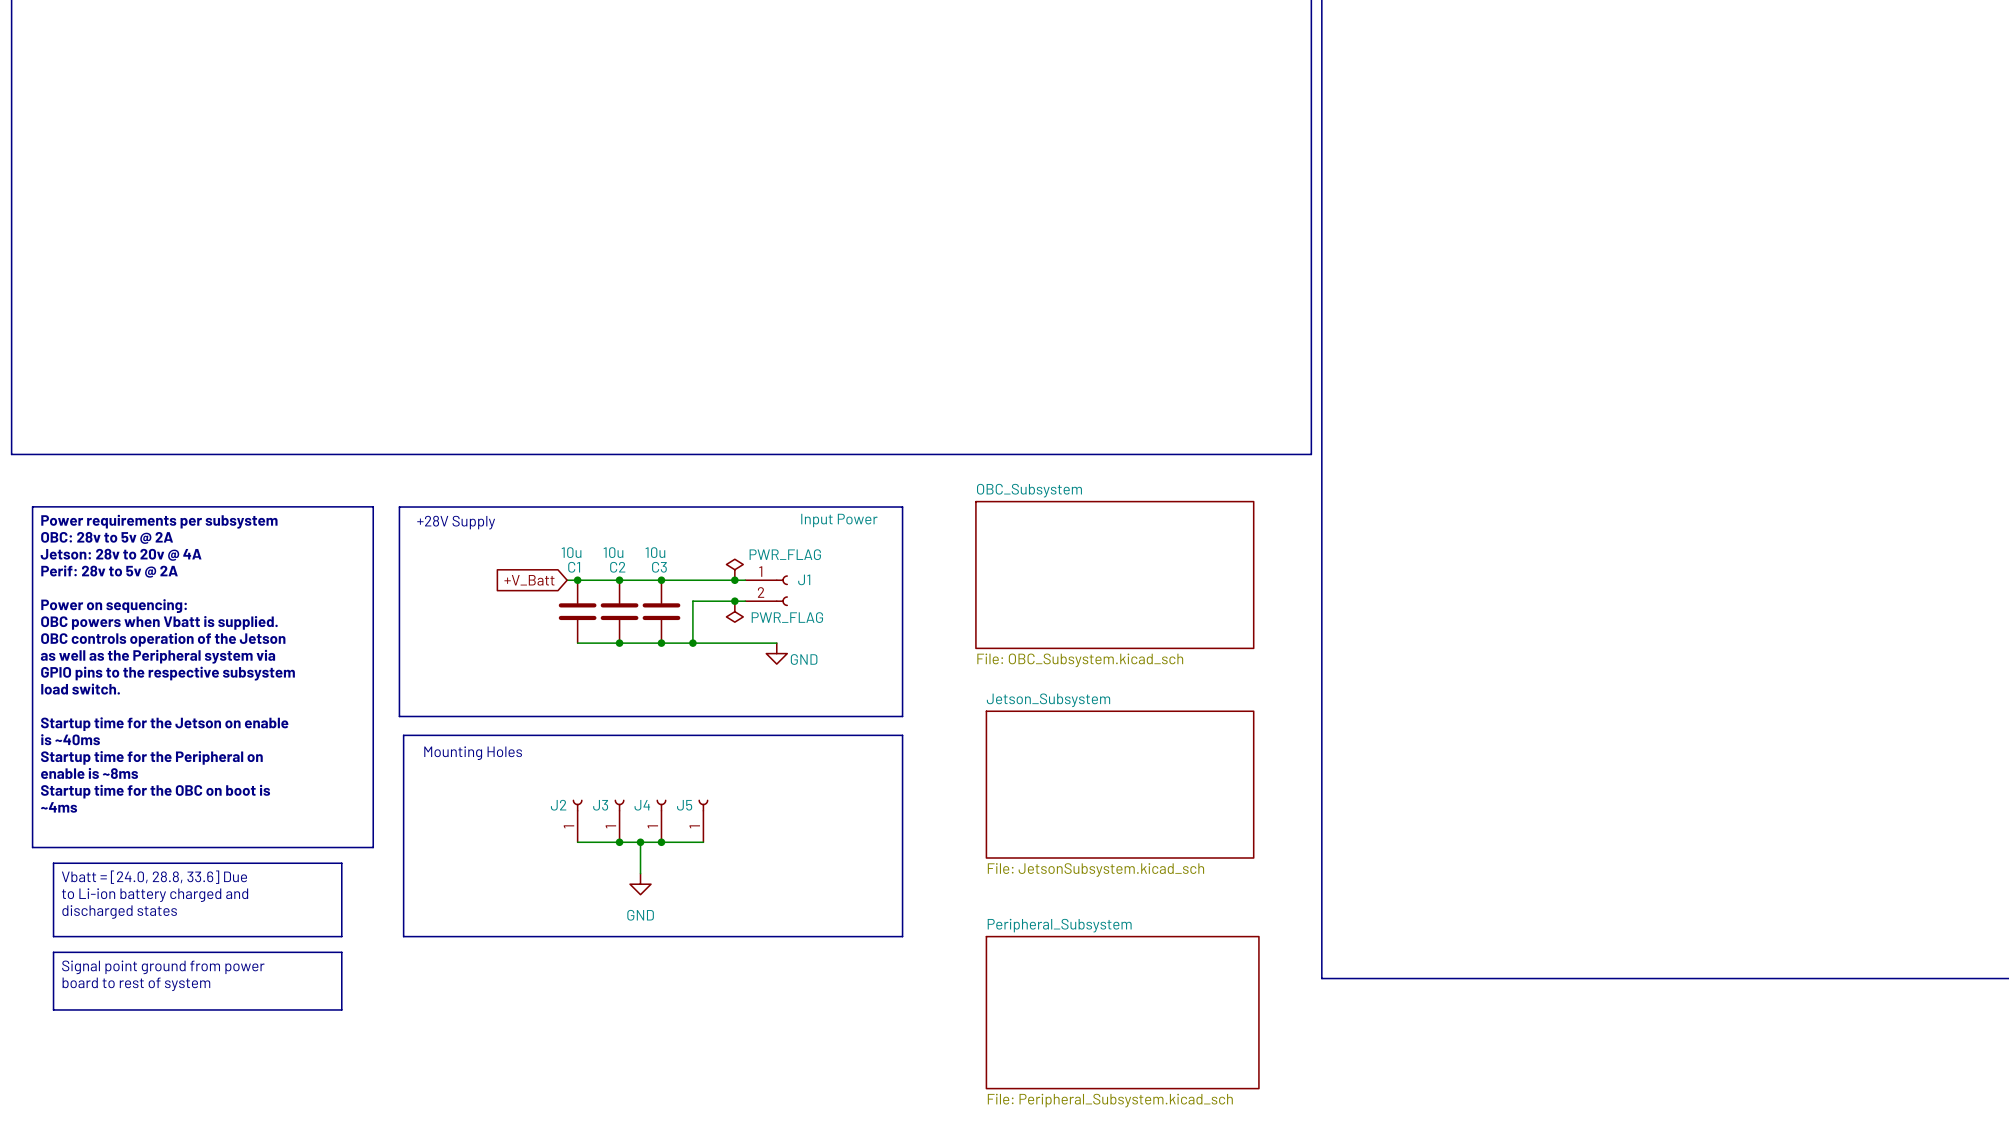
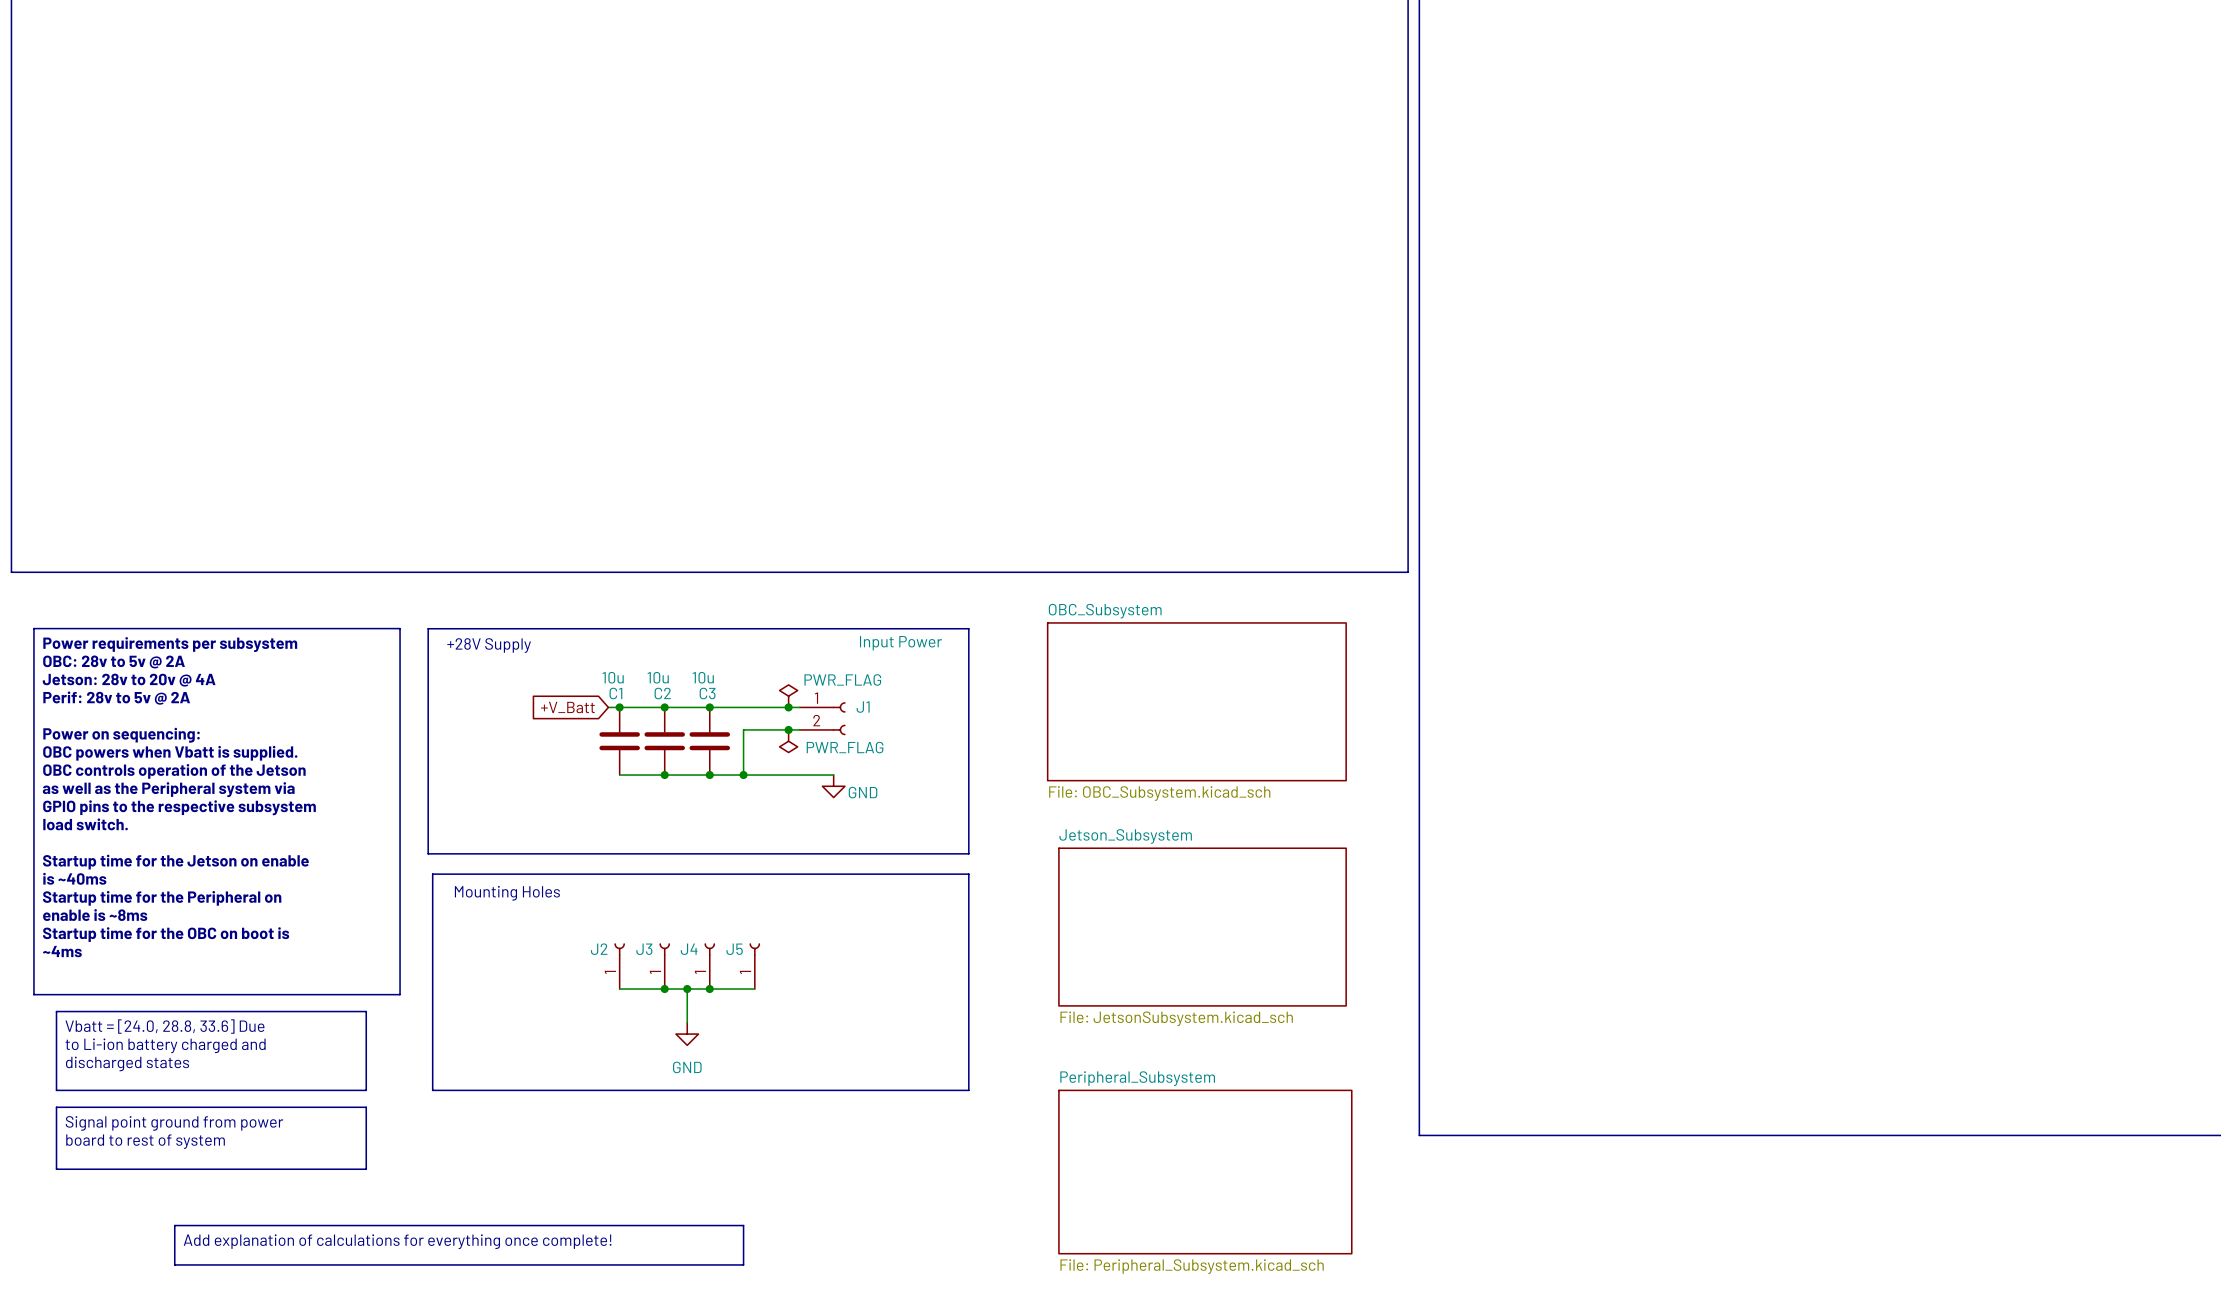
line: none -> (174, 1225) (743, 1225) (743, 1264) (174, 1264) (174, 1225)
text: none -> Add explanation of calculations for everything once complete! (397, 1241)

